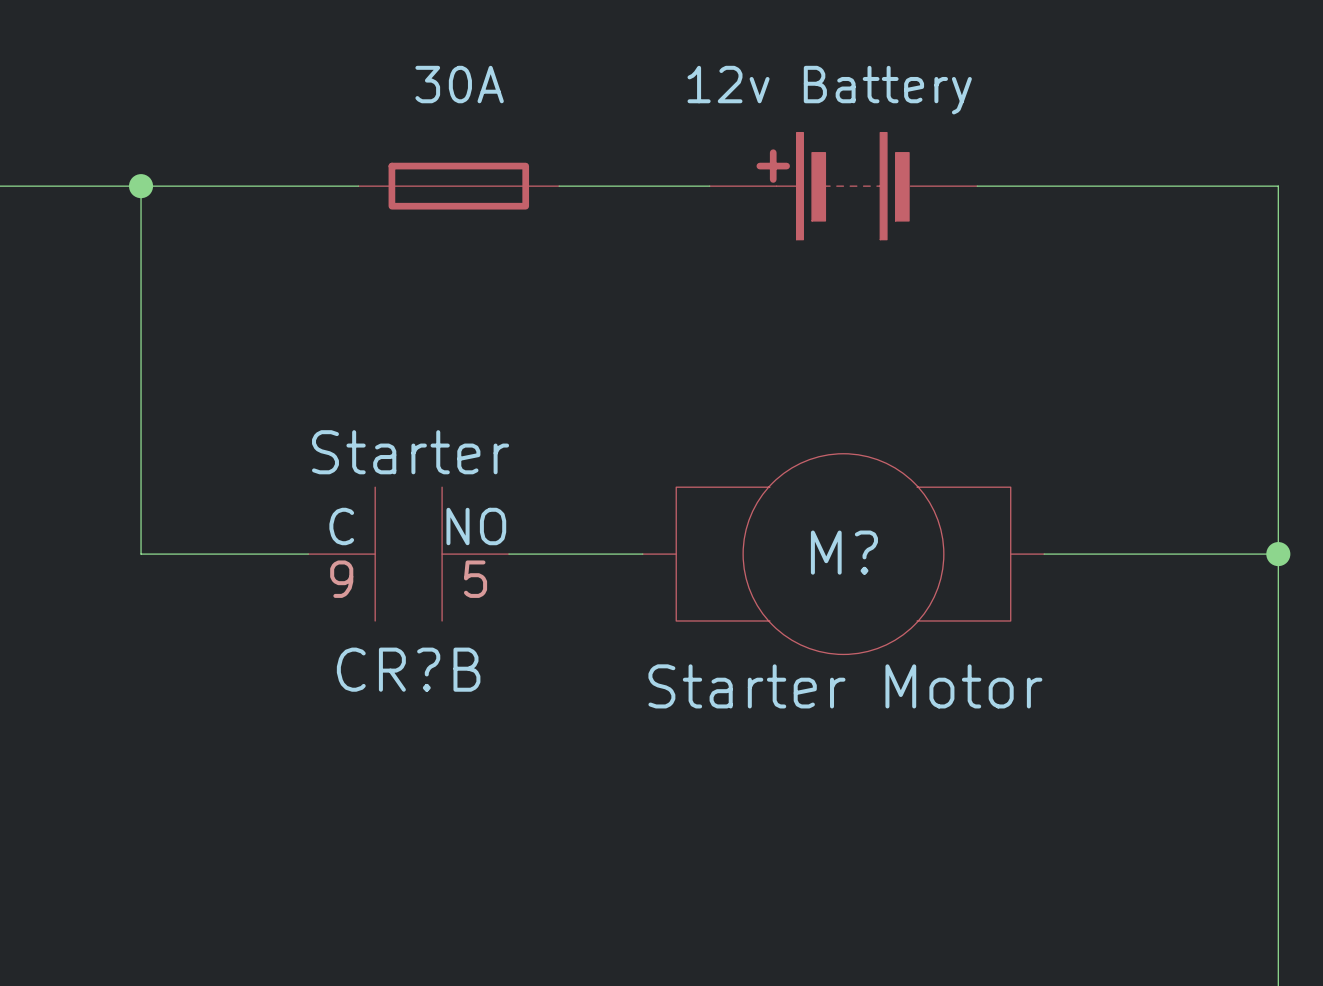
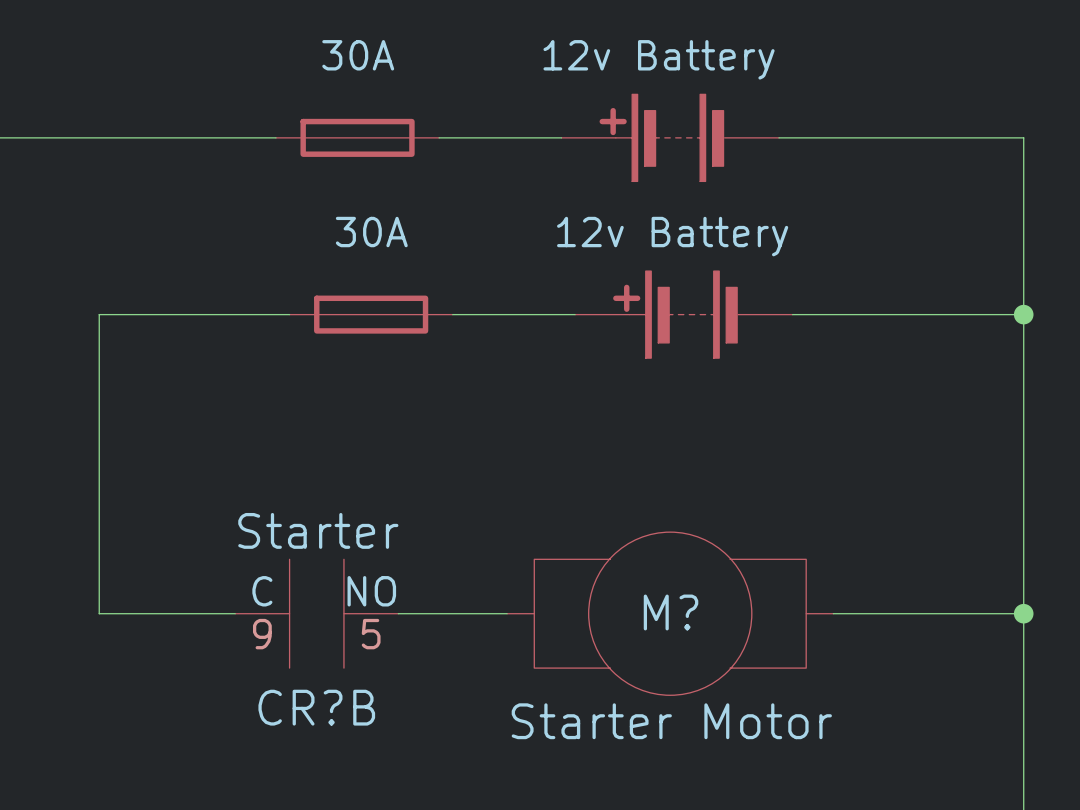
wire: (141, 186) (141, 403) -> (289, 314) (99, 314)
junction: (141, 186) -> none
part: none -> 30A (371, 314)
wire: none -> (452, 314) (575, 314)
part: none -> 12v Battery (683, 314)
wire: none -> (792, 314) (1023, 314)
junction: none -> (1023, 314)
wire: (141, 554) (308, 554) -> (99, 436) (99, 613) (235, 613)
CR?B position: (408, 554) -> (316, 613)
wire: (508, 554) (642, 554) -> (398, 613) (507, 613)
M? position: (843, 554) -> (670, 613)
wire: (1044, 554) (1278, 554) -> (833, 613) (1023, 613)
junction: (1278, 554) -> none
junction: none -> (1023, 613)

